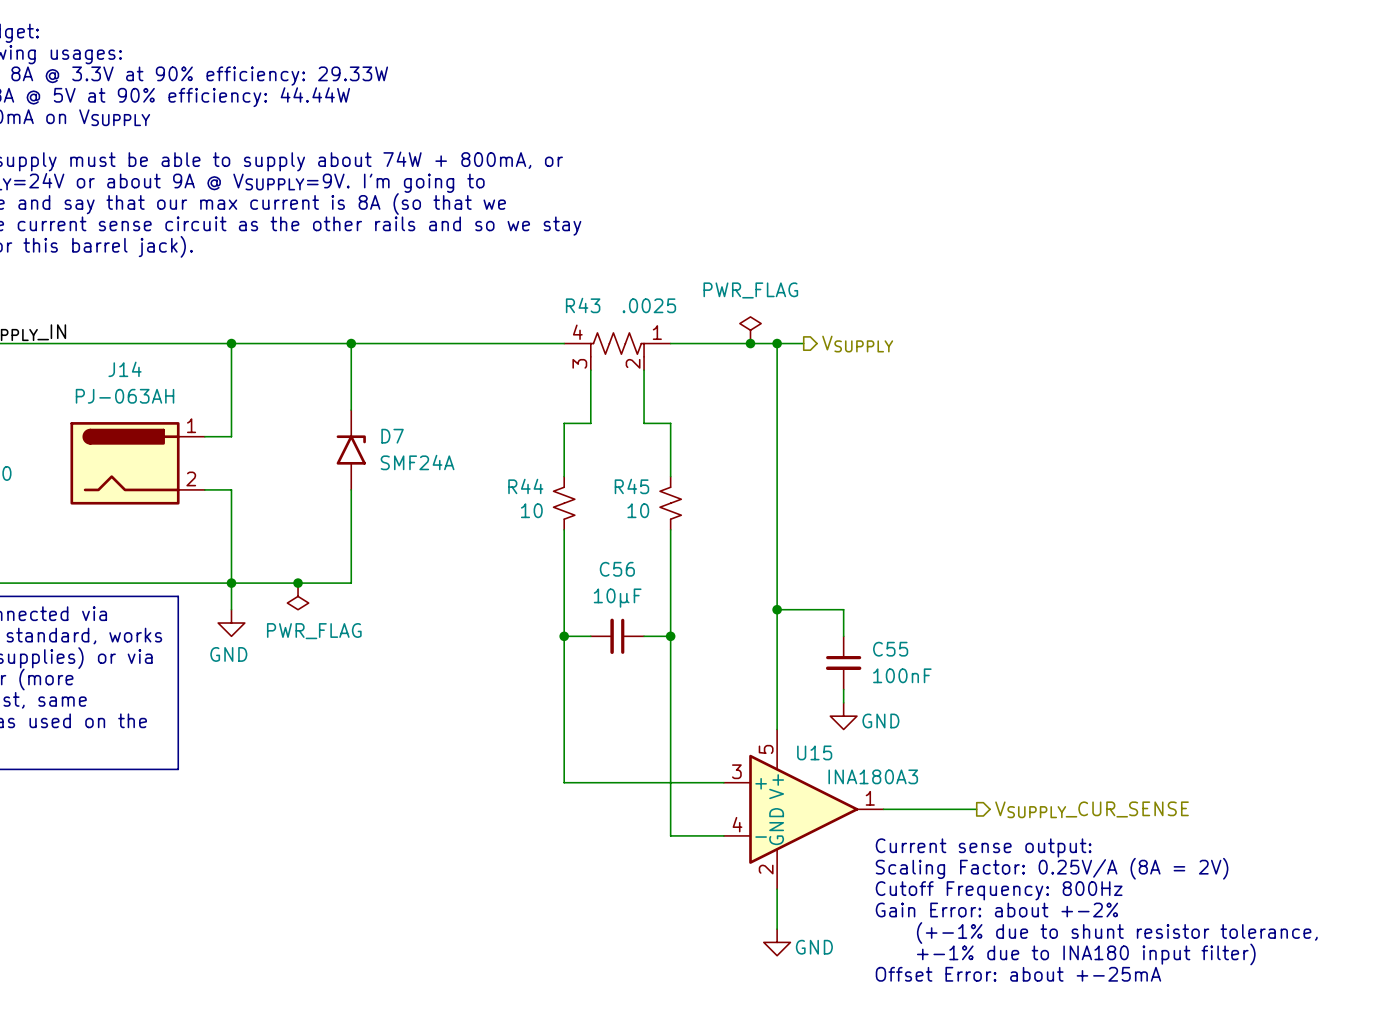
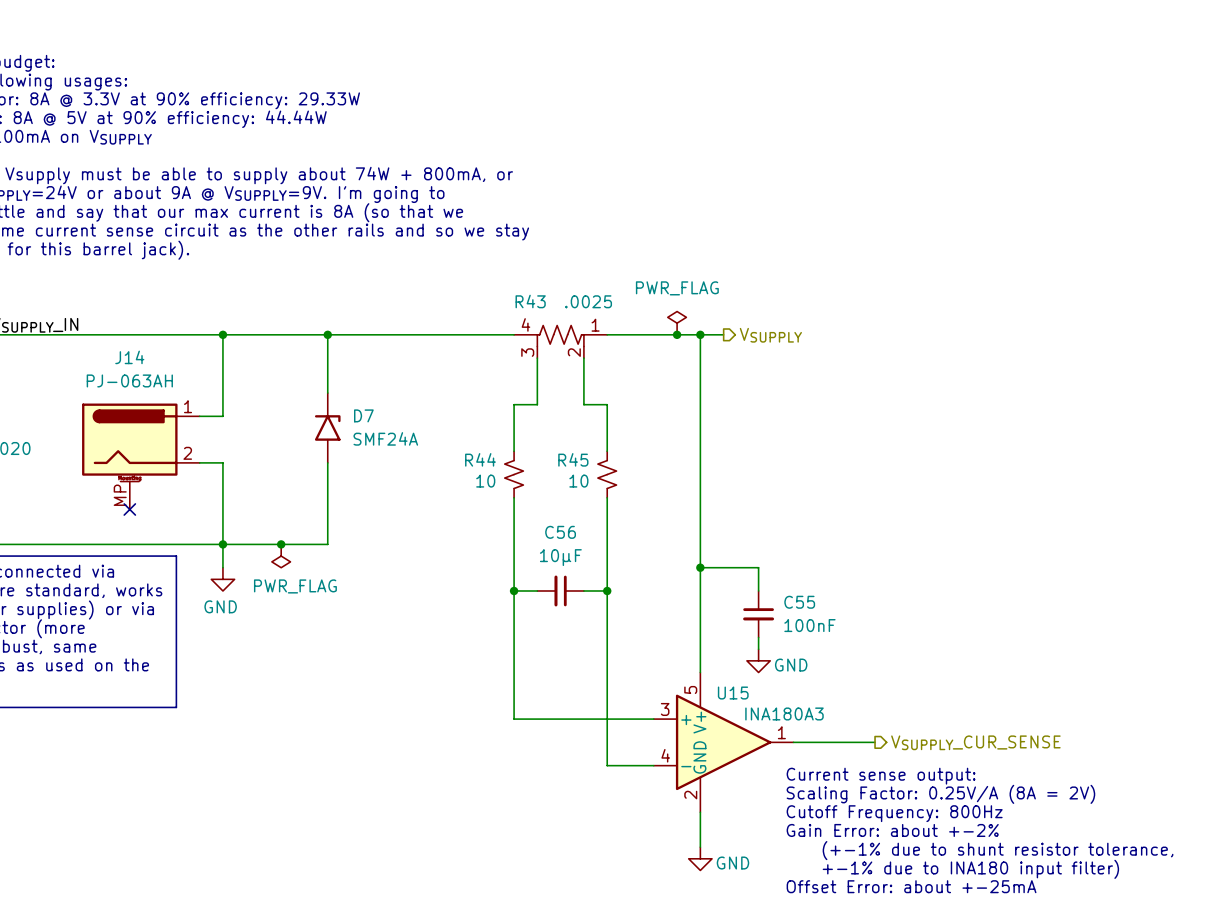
J14 symbol: [70, 422, 205, 505] -> [82, 403, 200, 510]
no-connect mark: none -> (129, 509)

